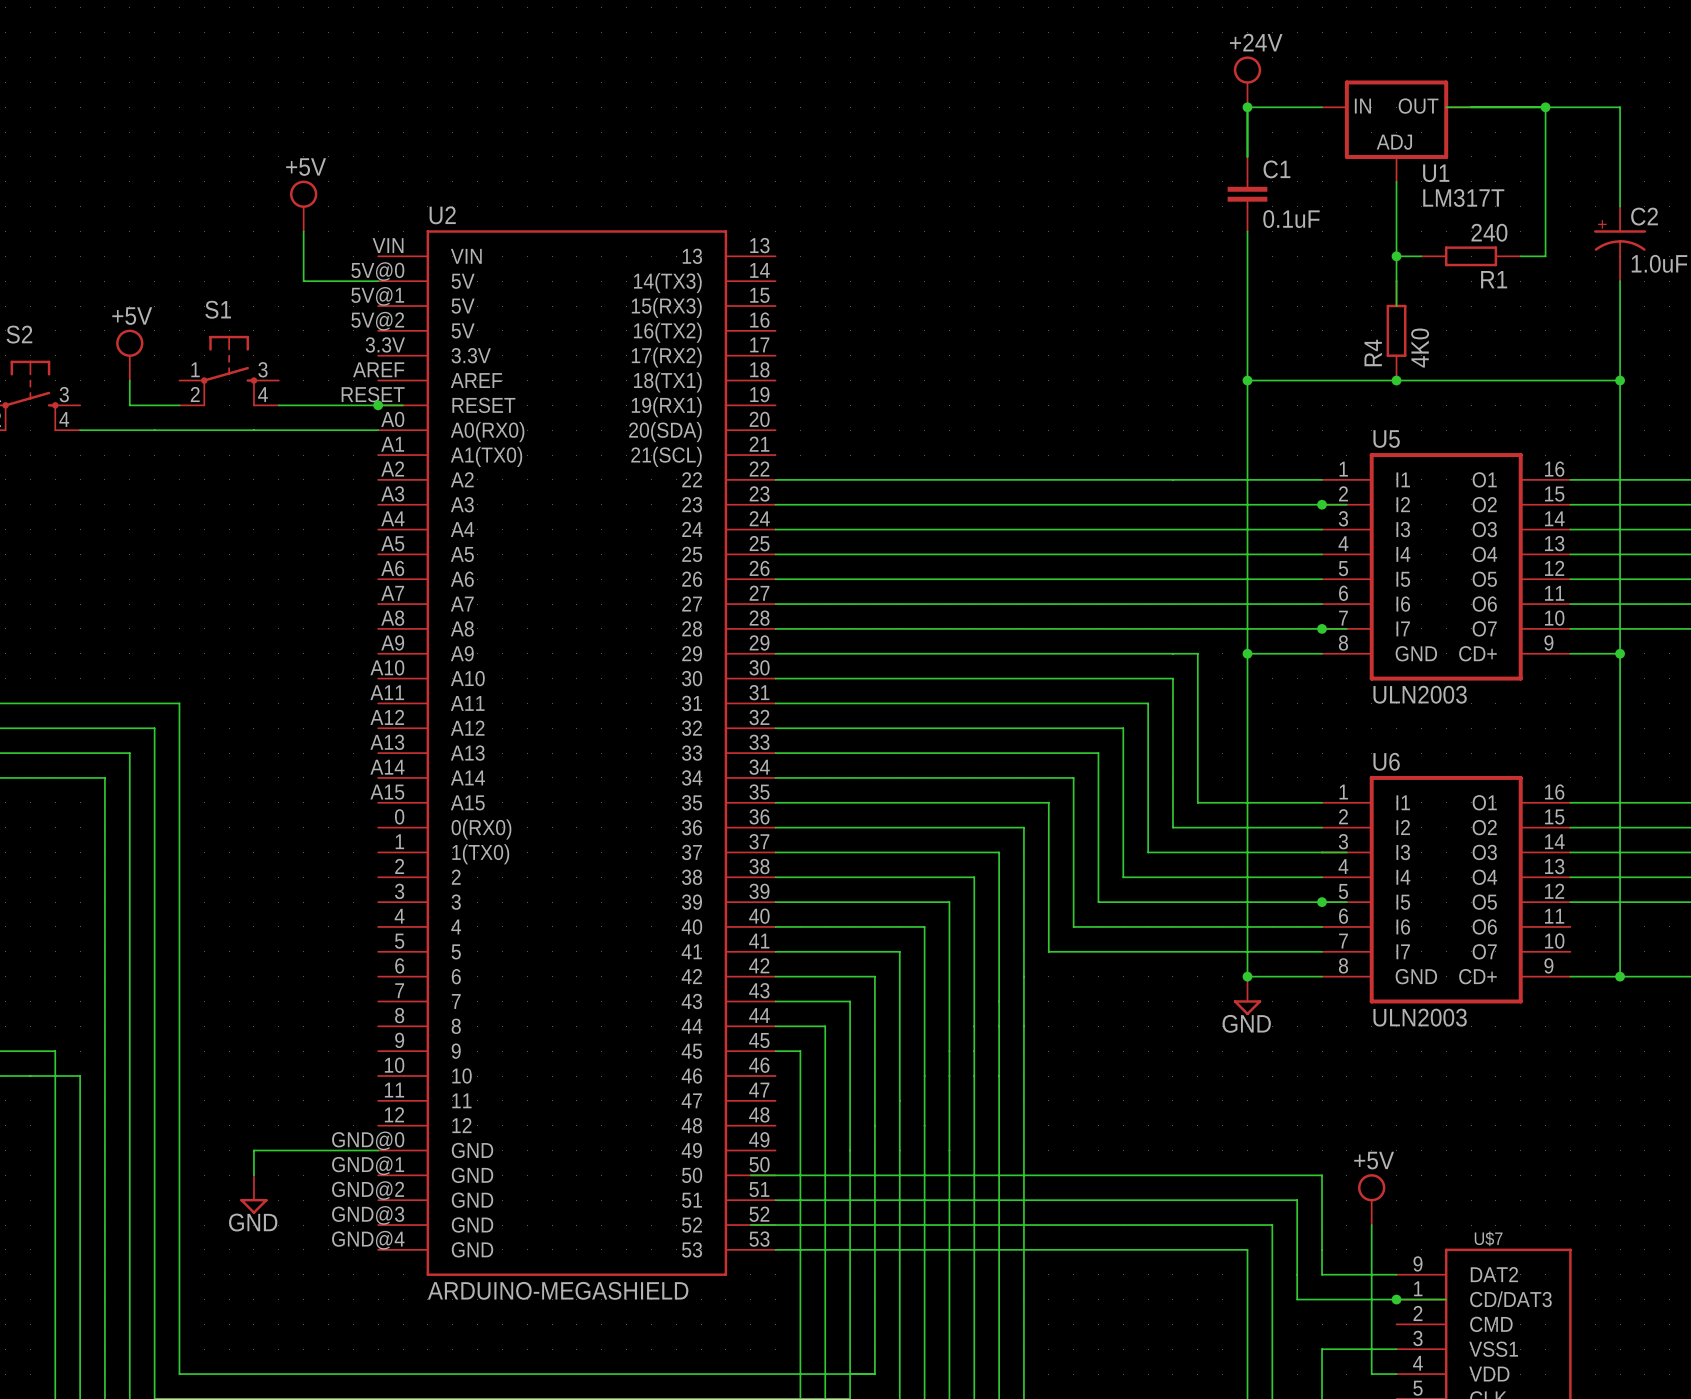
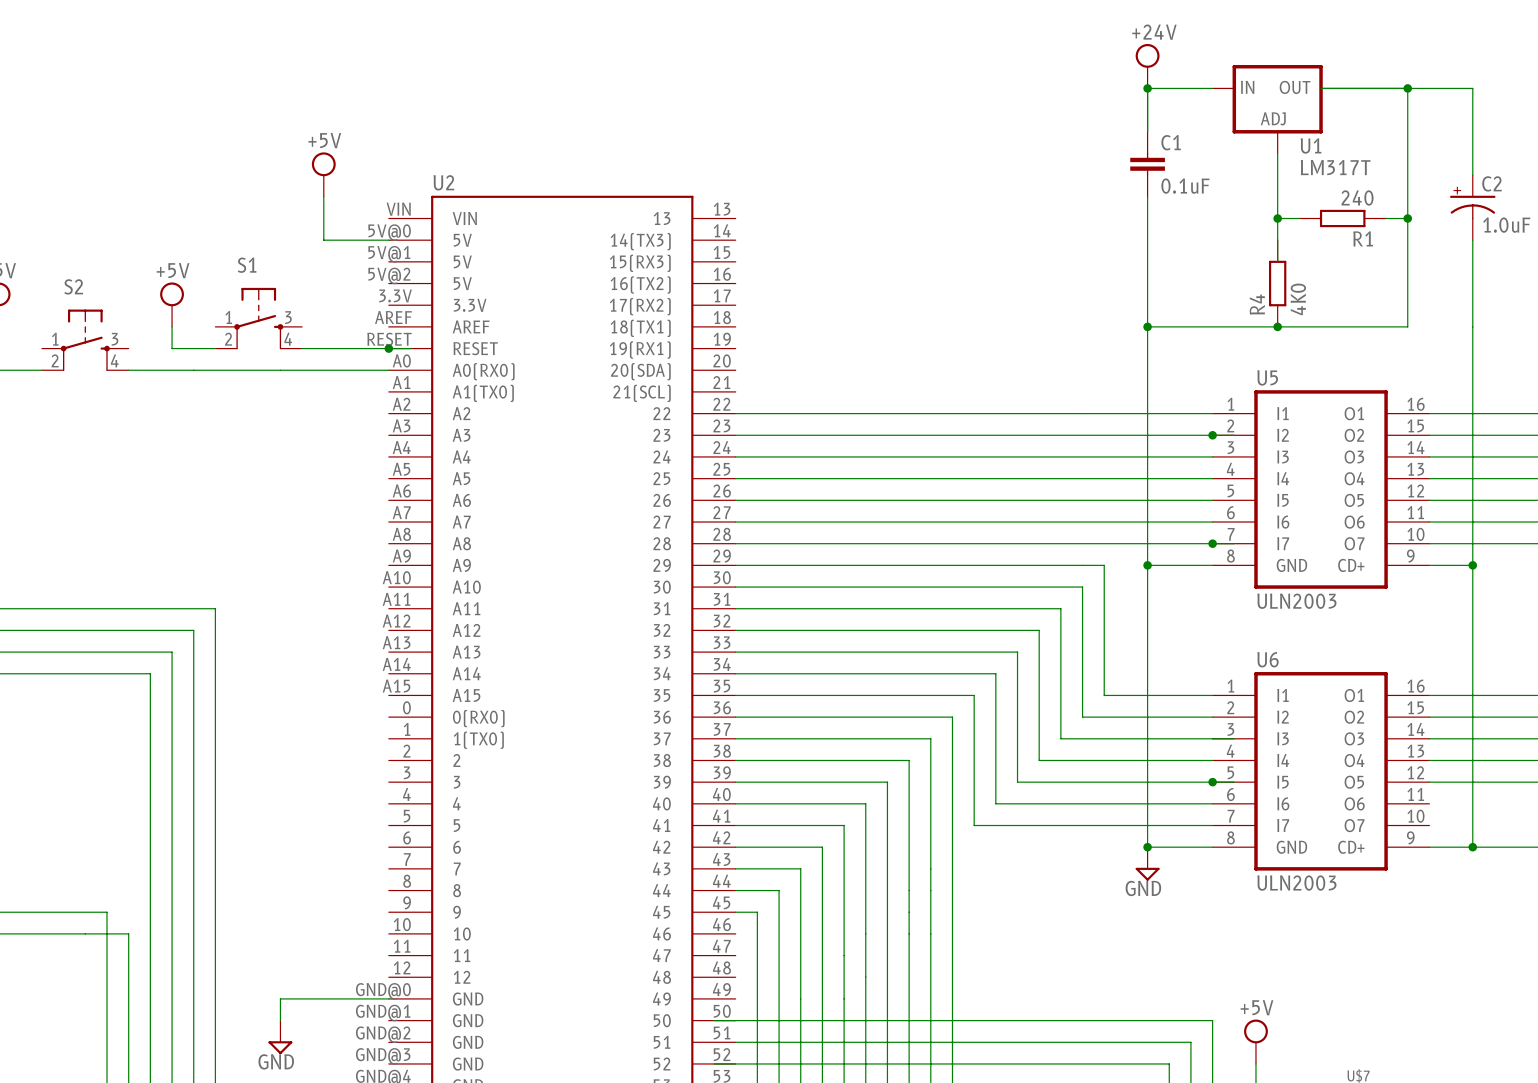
junction: none -> (1407, 218)
wire: (1545, 380) (1620, 380) -> (1407, 326) (1407, 218)
junction: (1620, 380) -> none

